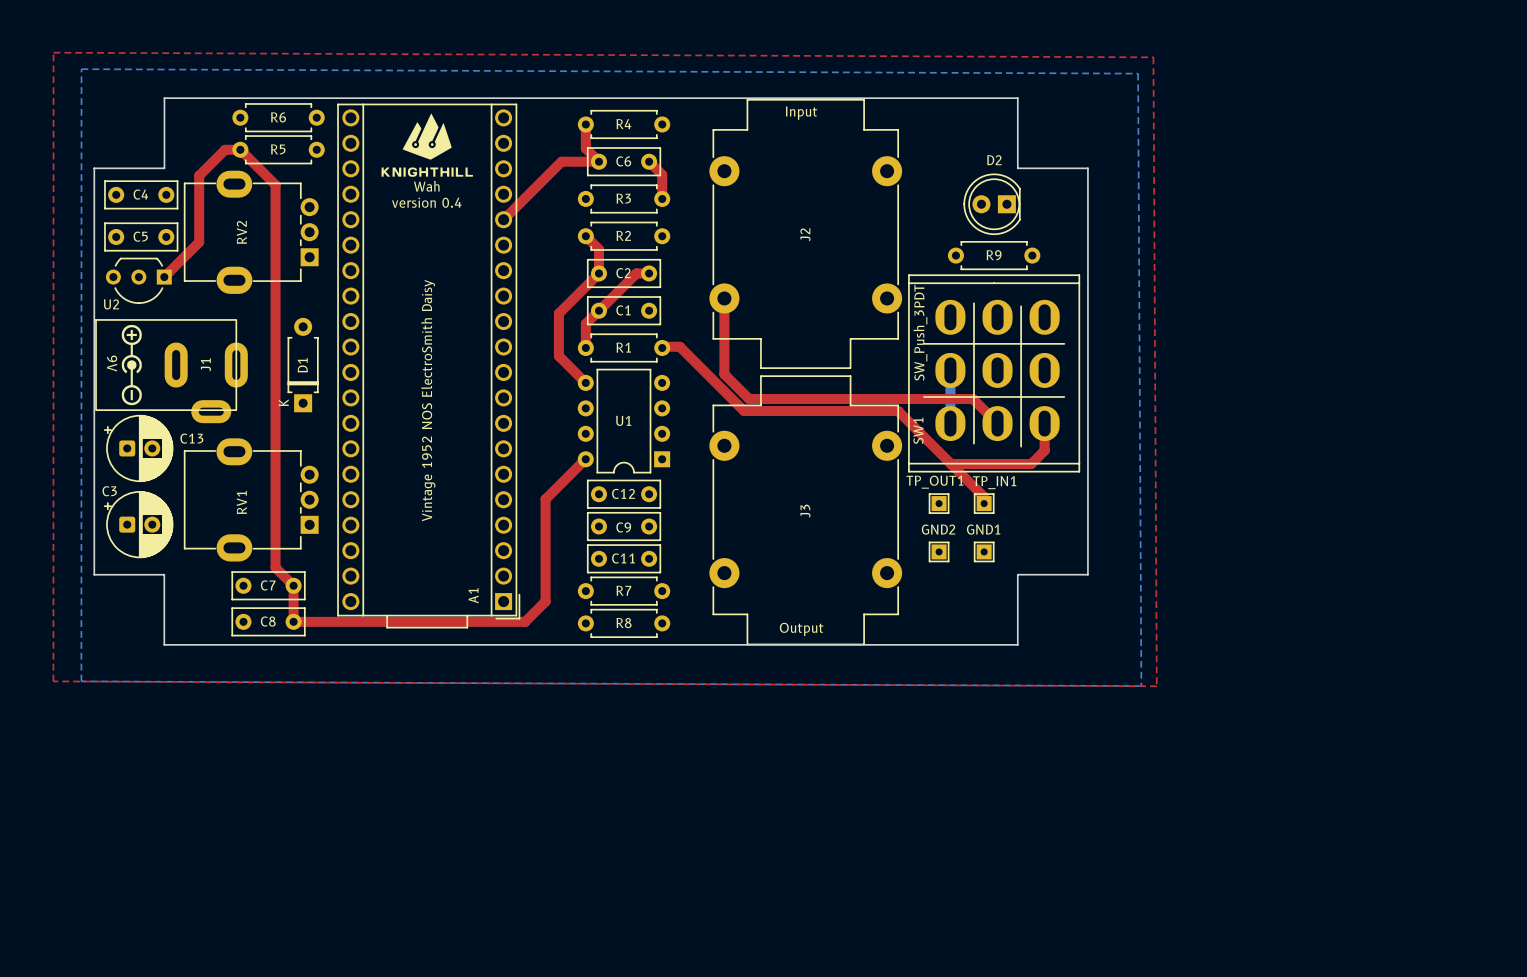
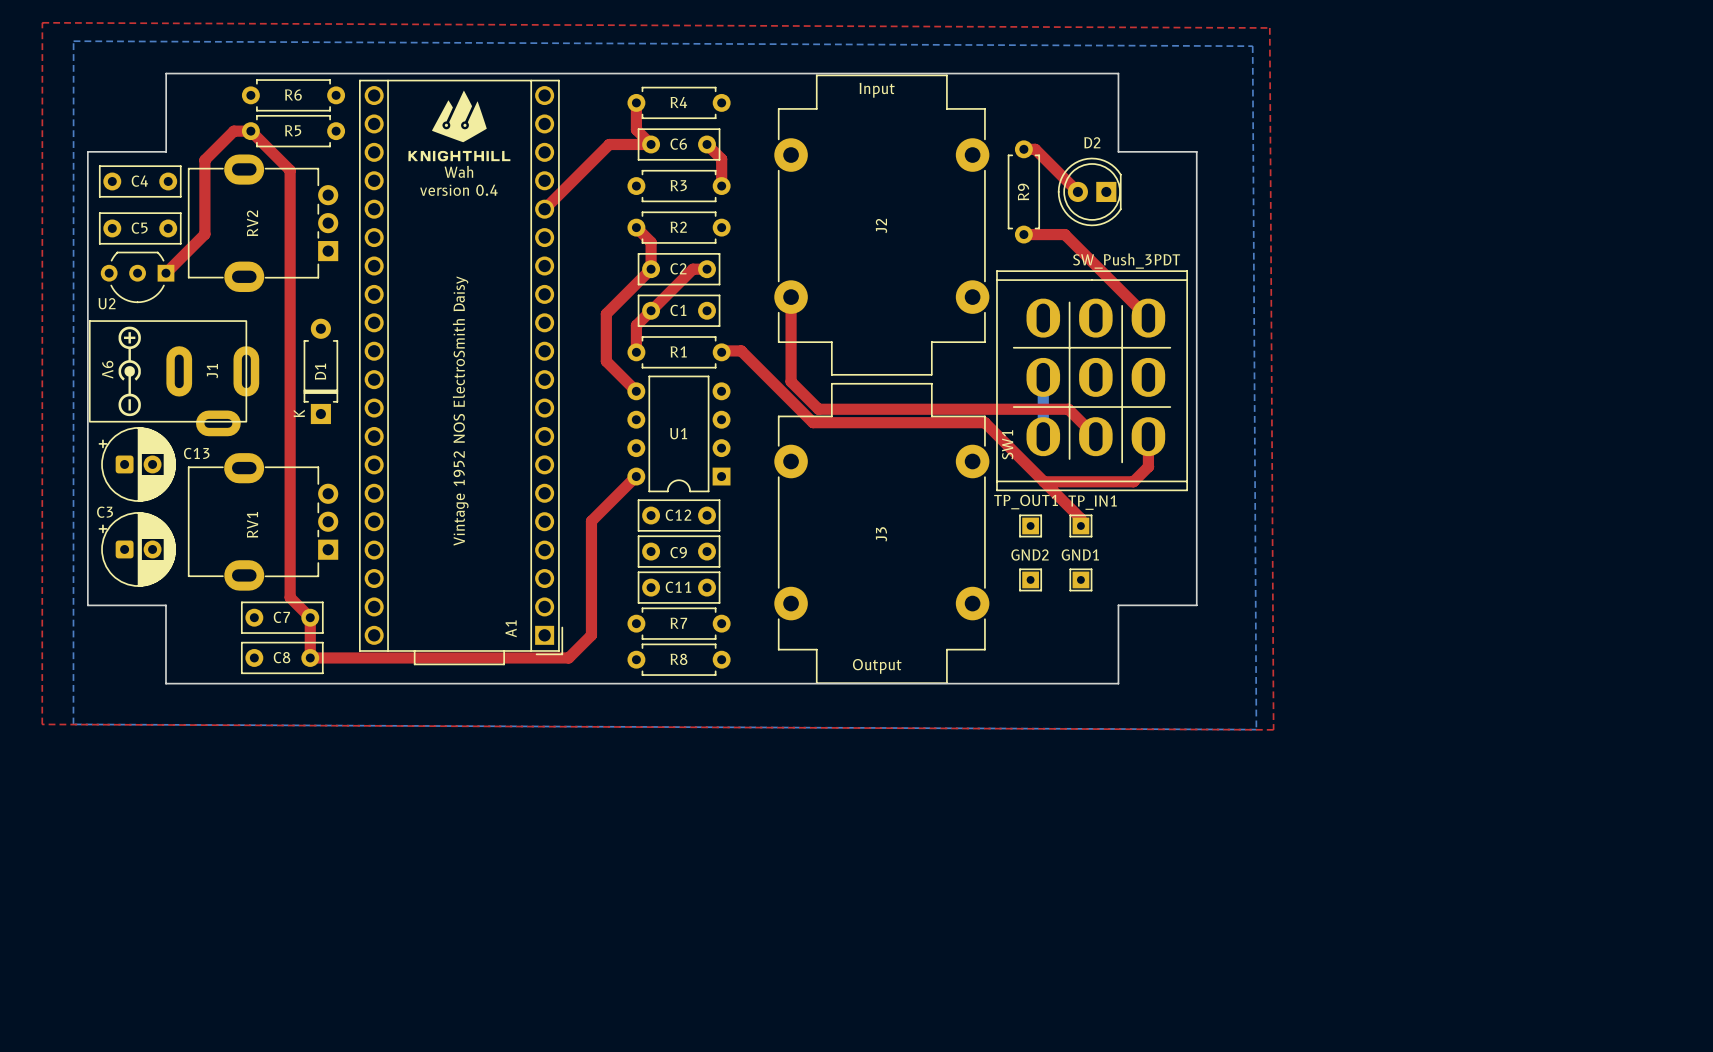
top track: none -> (1023, 149) (1035, 149) (1077, 191)
top track: none -> (1023, 234) (1064, 234) (1148, 318)
R9 rotation: 0° (994, 255) -> 90° clockwise (1023, 191)
R9 position: (994, 255) -> (1023, 191)
SW1 value rotation: 0° (920, 332) -> 90° clockwise (1126, 261)

